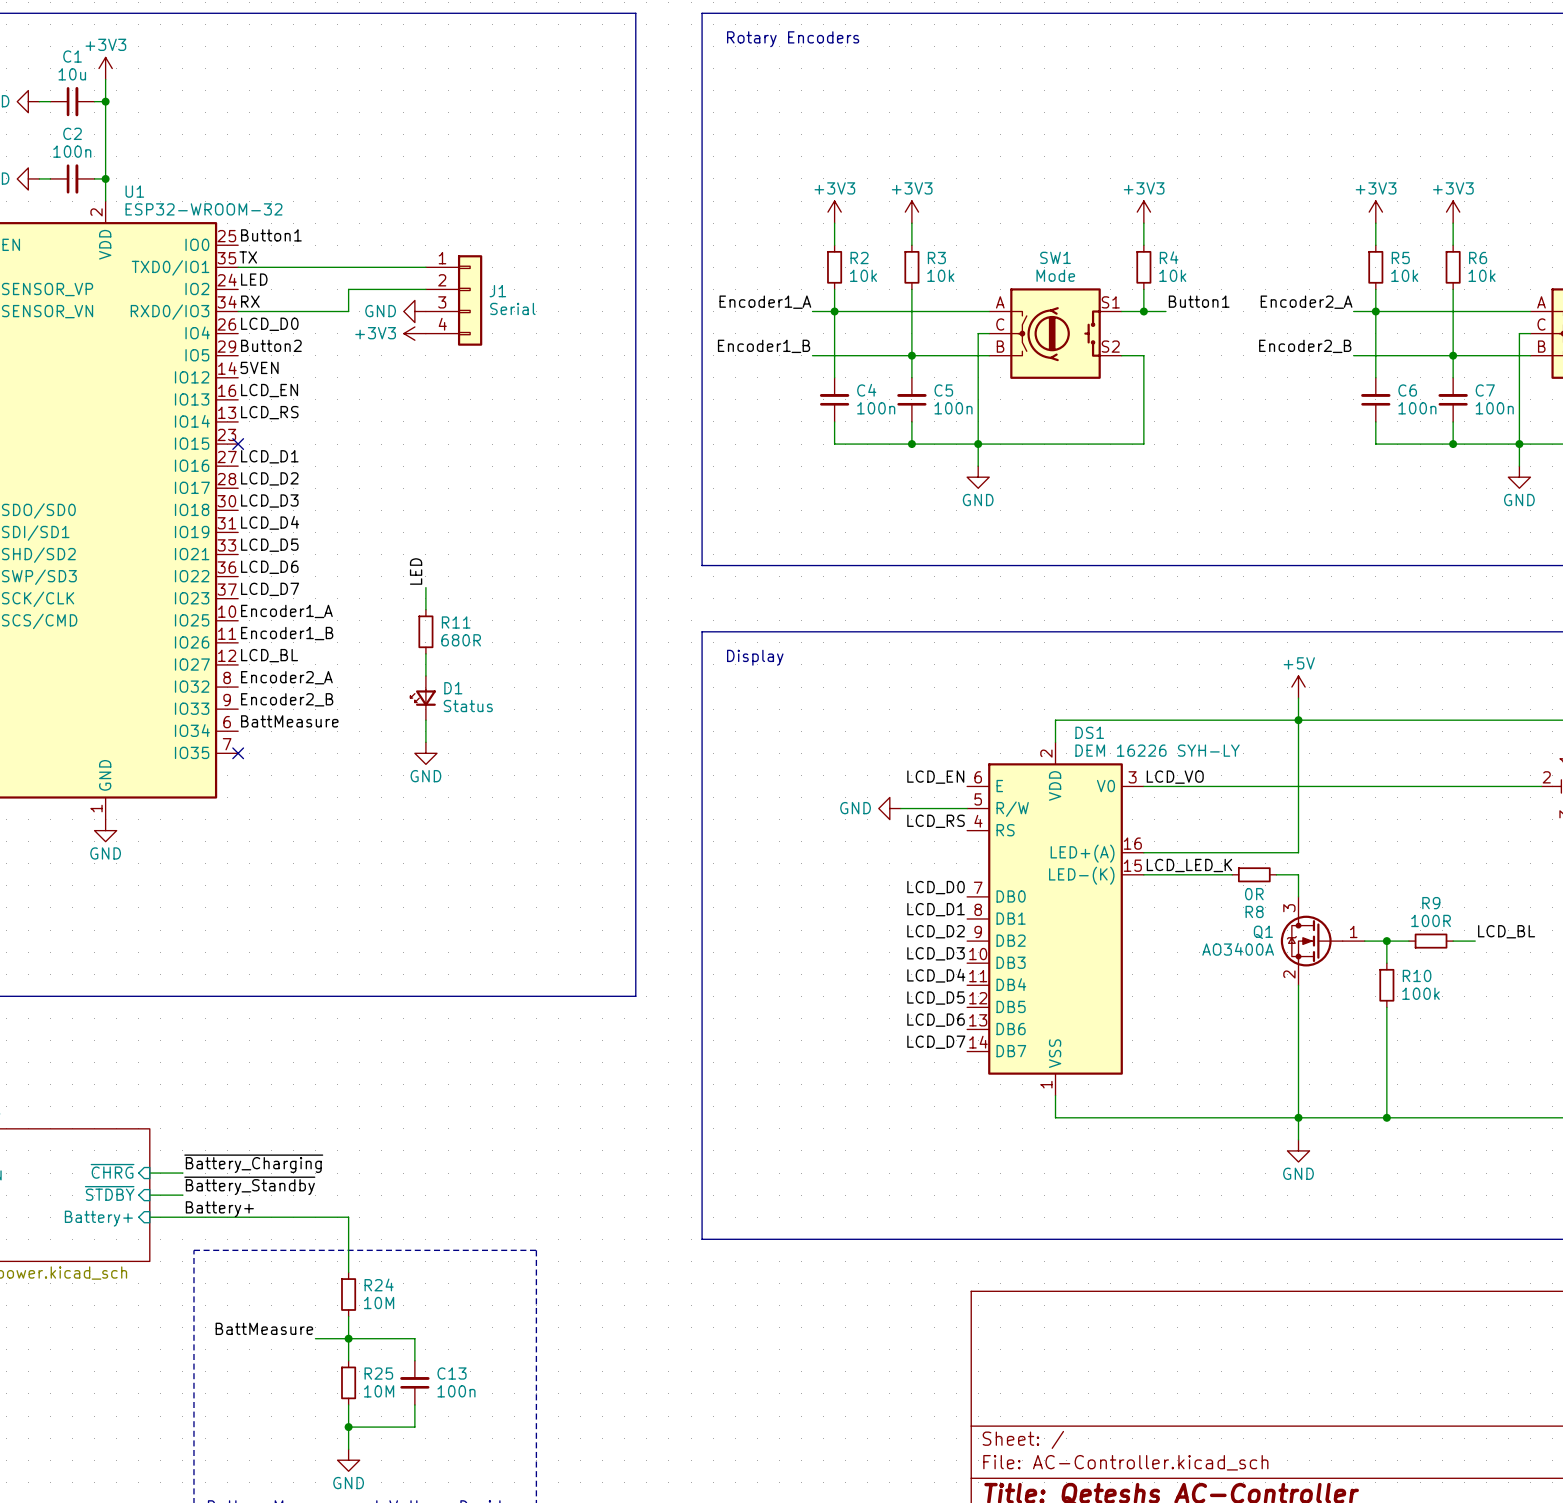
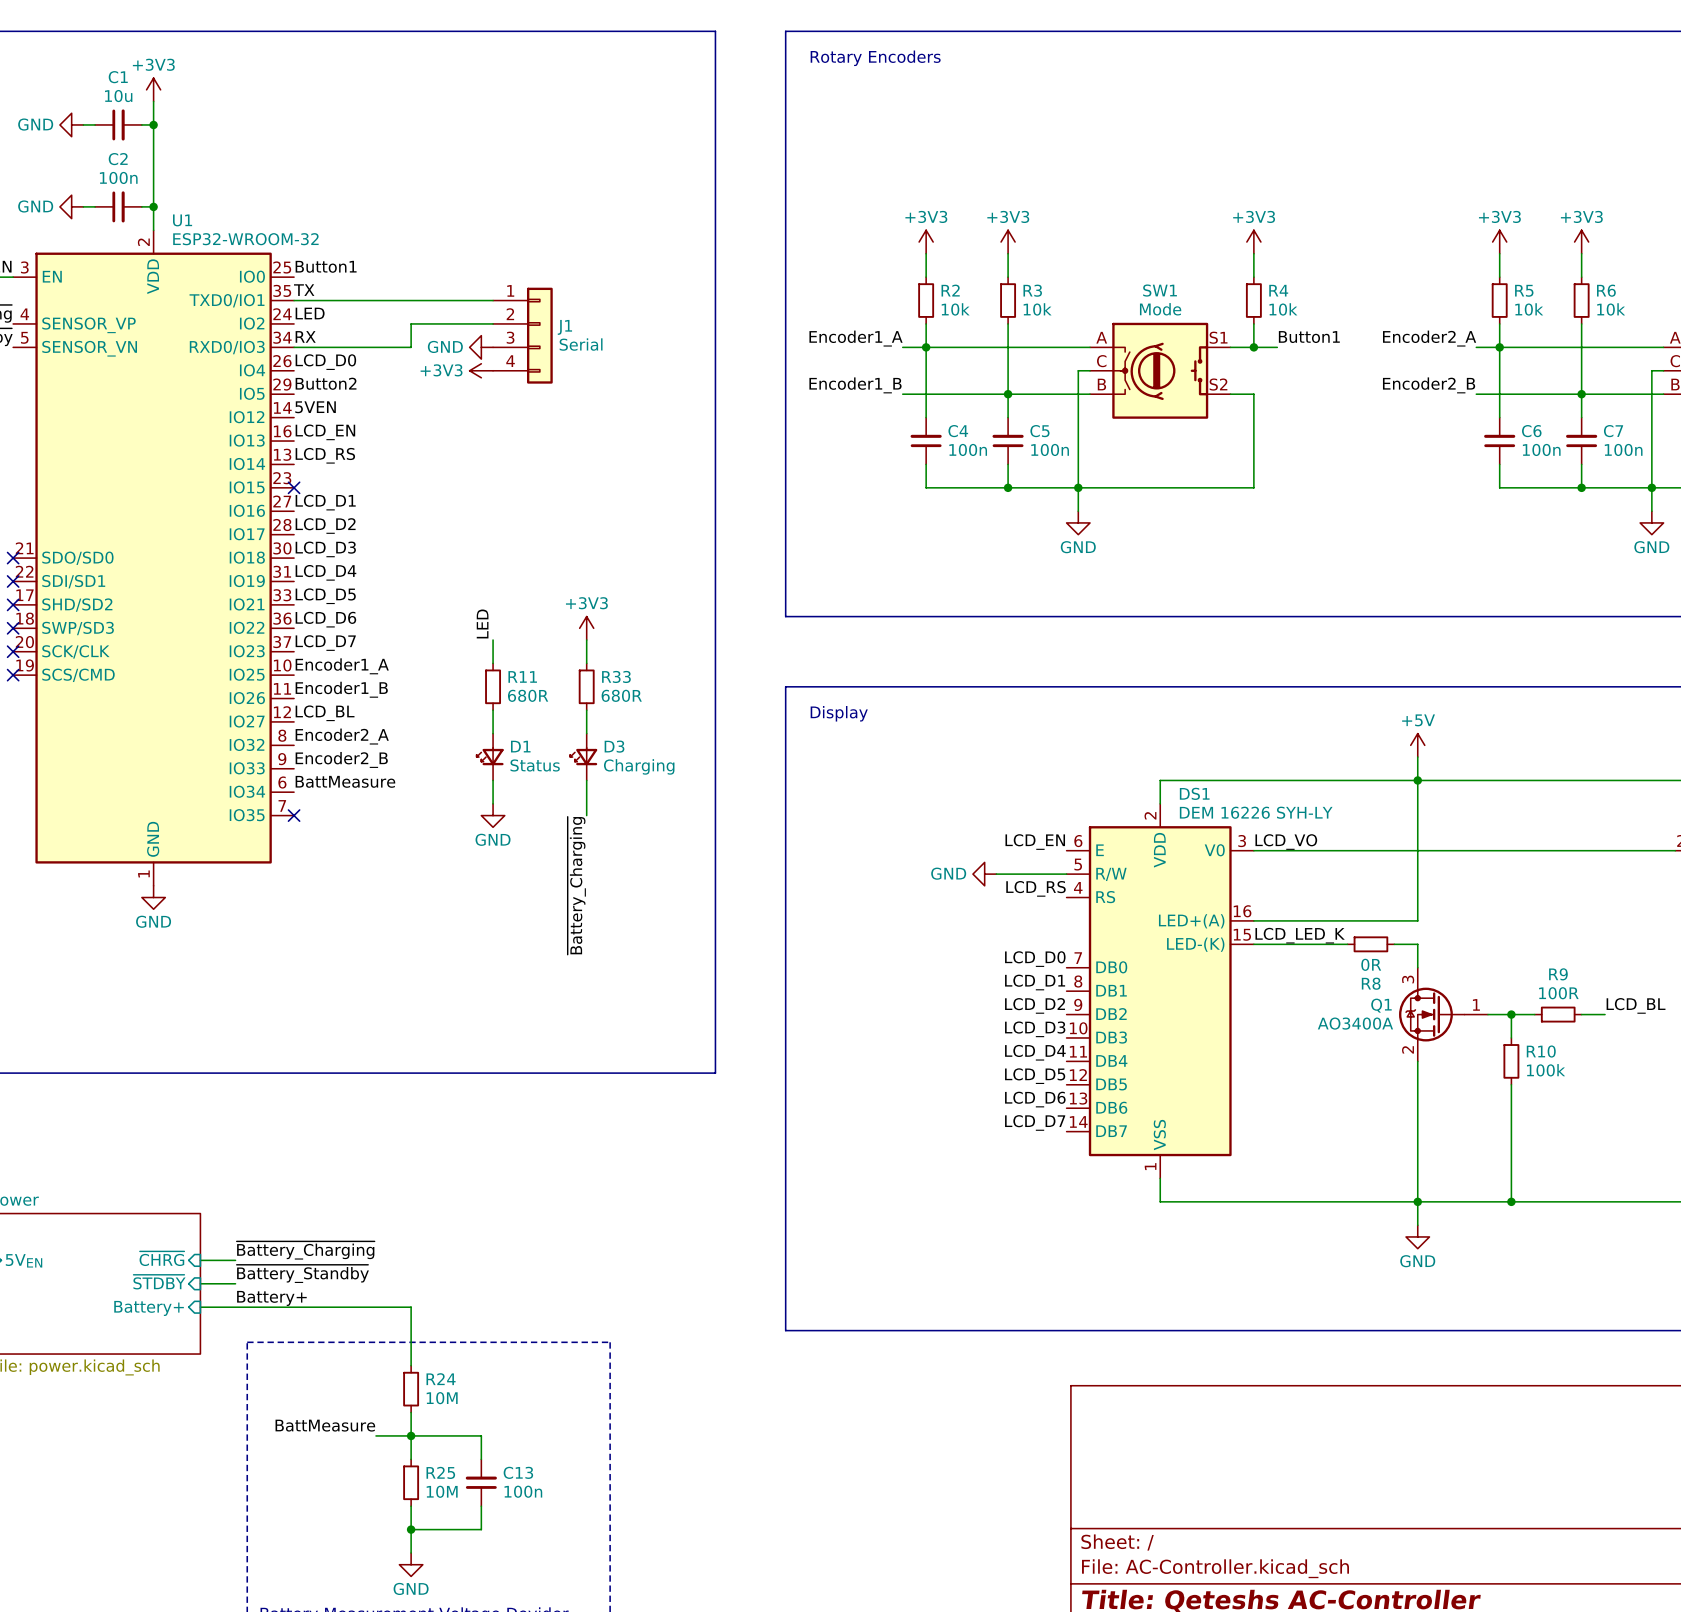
power symbol: none -> +3V3 (586, 628)
wire: none -> (586, 640) (586, 663)
R33: none -> 680R (586, 686)
wire: none -> (586, 710) (586, 733)
D3: none -> Charging (583, 757)
wire: none -> (586, 780) (586, 815)
label: none -> ~{Battery_Charging} (576, 885)

